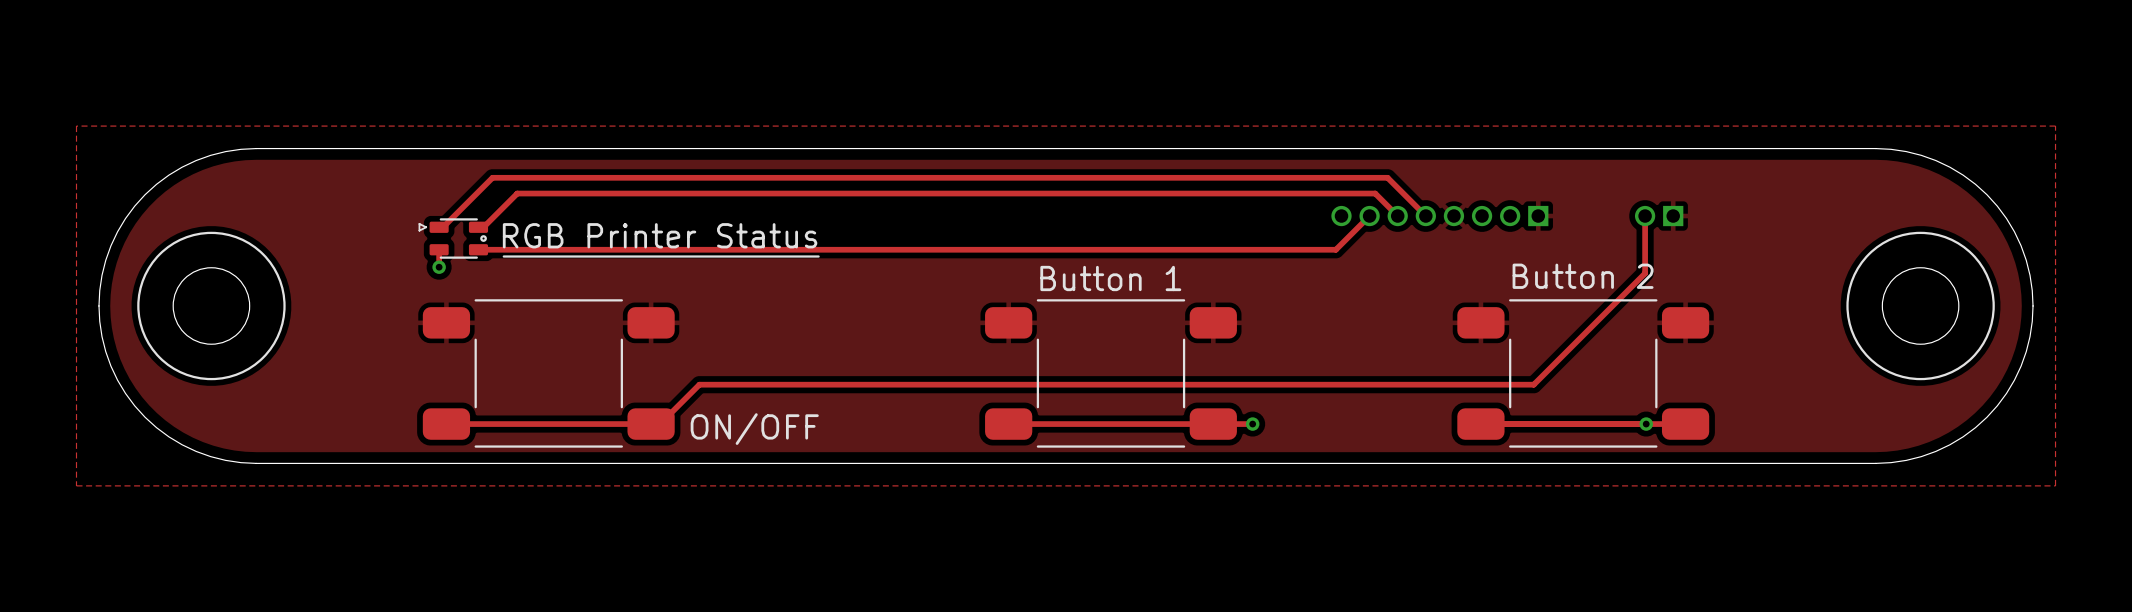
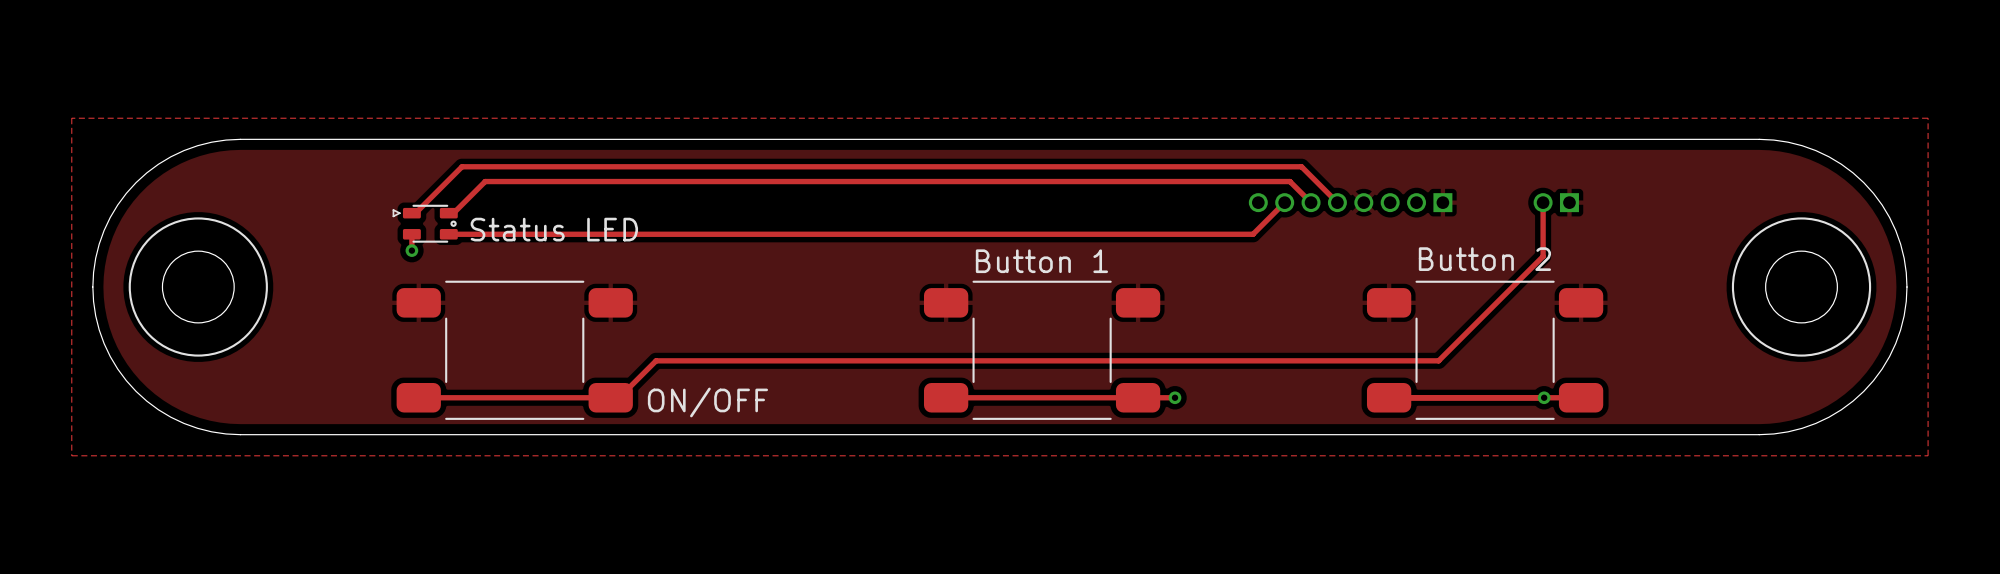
text: RGB Printer Status (660, 235) -> Status LED (554, 229)
line: (503, 256) (818, 256) -> none

